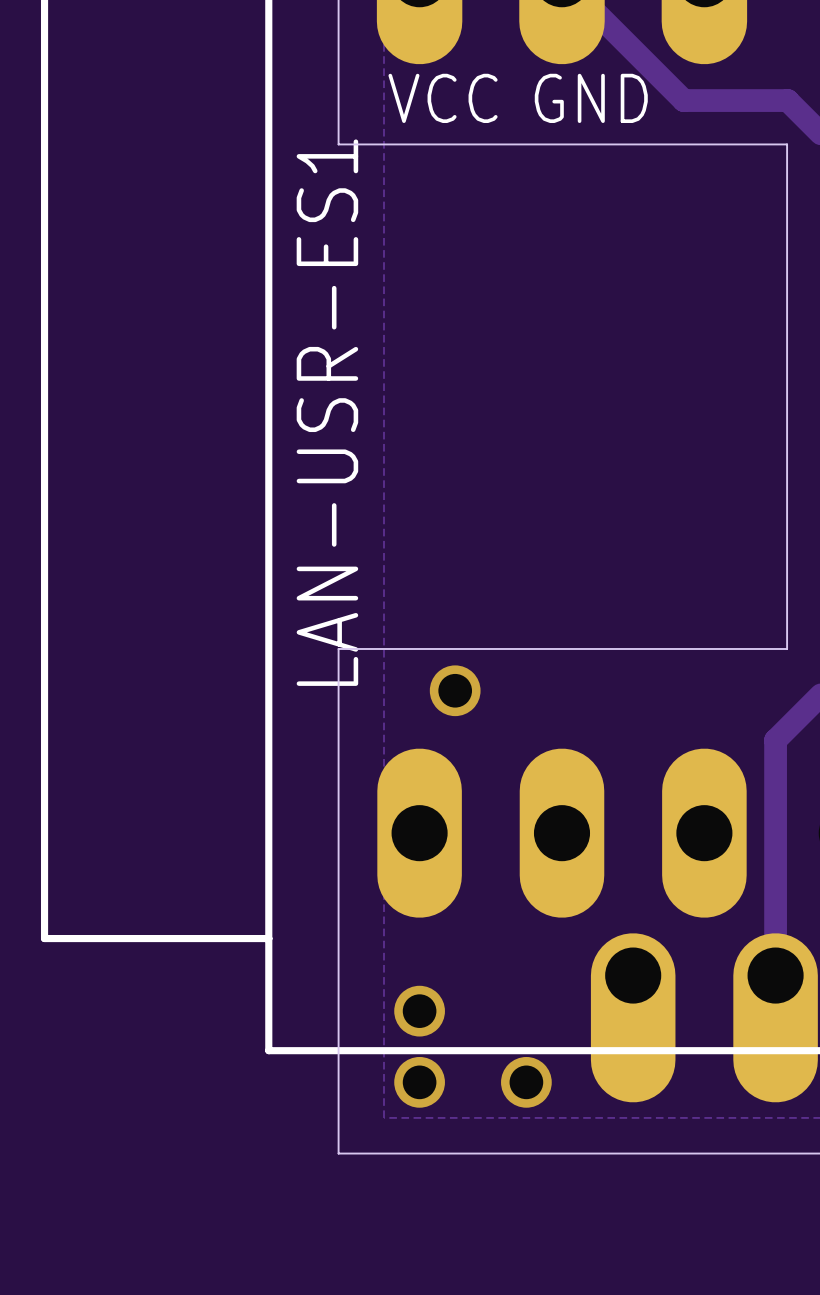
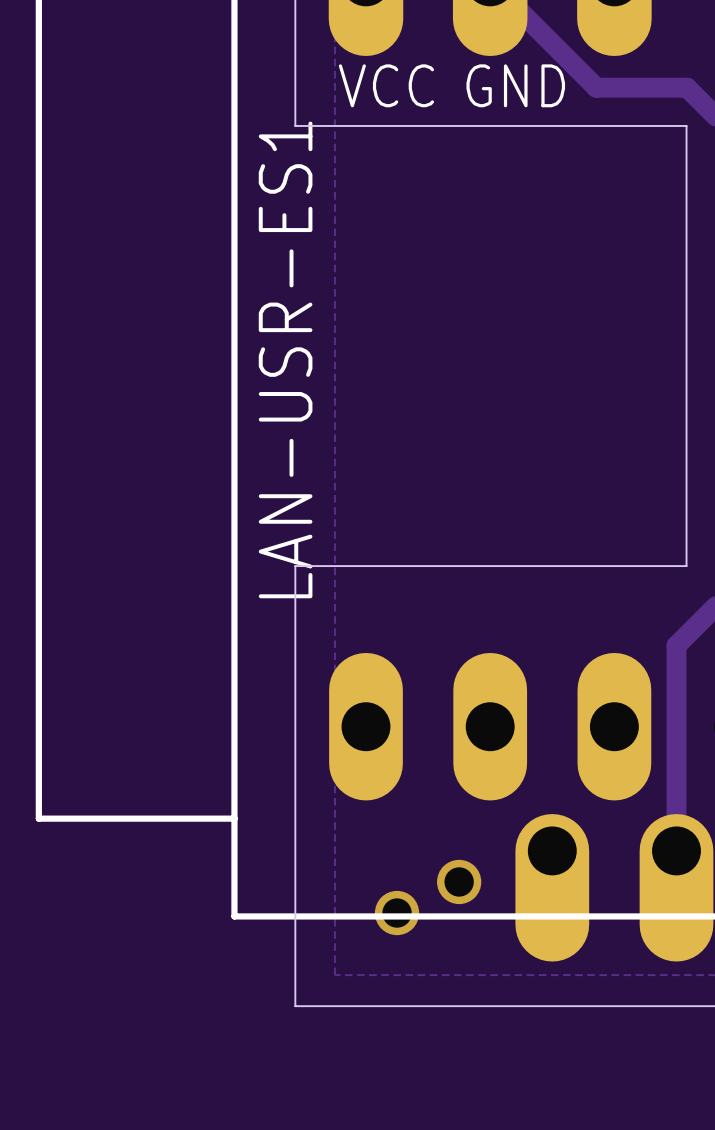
via: (455, 690) -> none
via: (419, 1011) -> none
via: none -> (459, 881)
via: none -> (397, 913)
via: (419, 1082) -> none
via: (526, 1082) -> none

